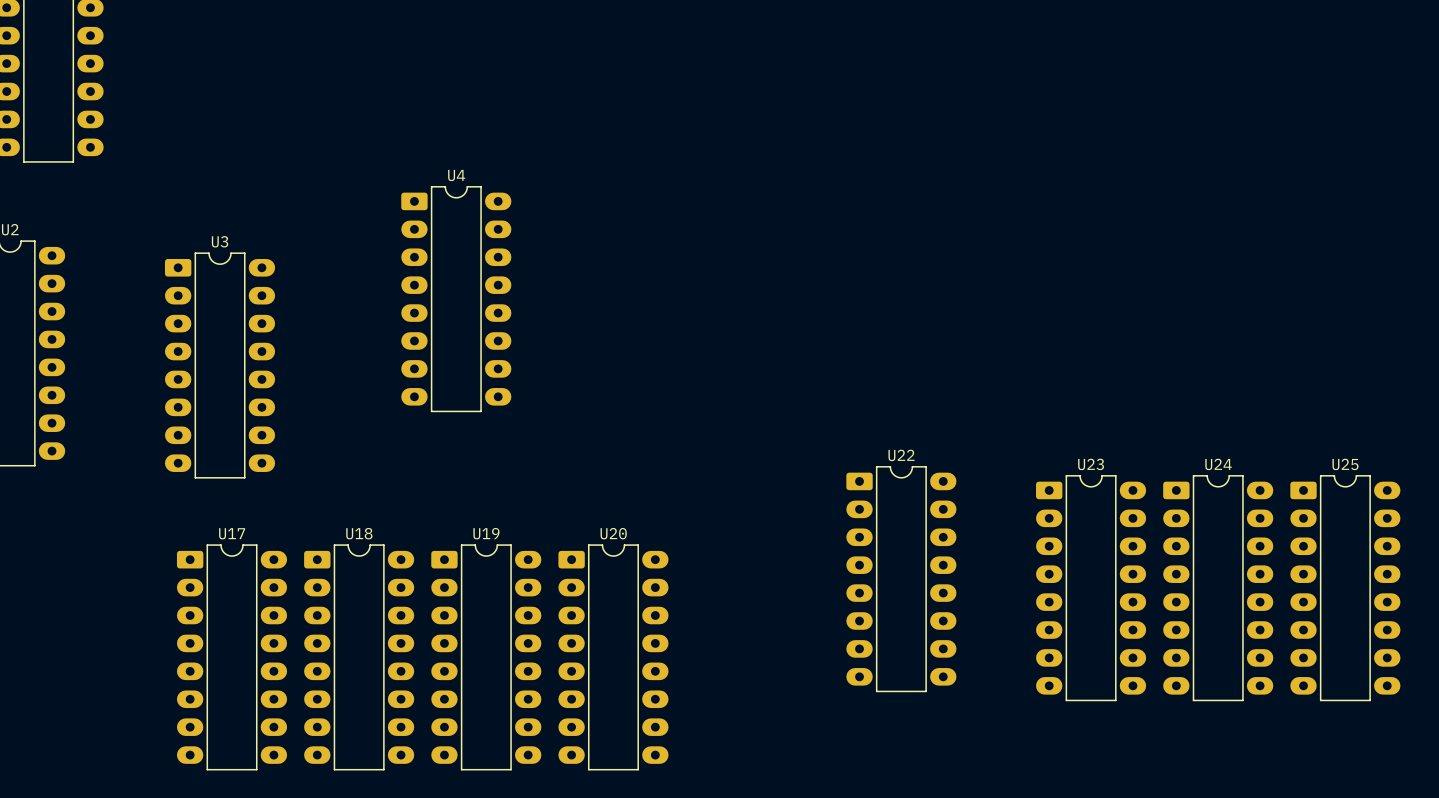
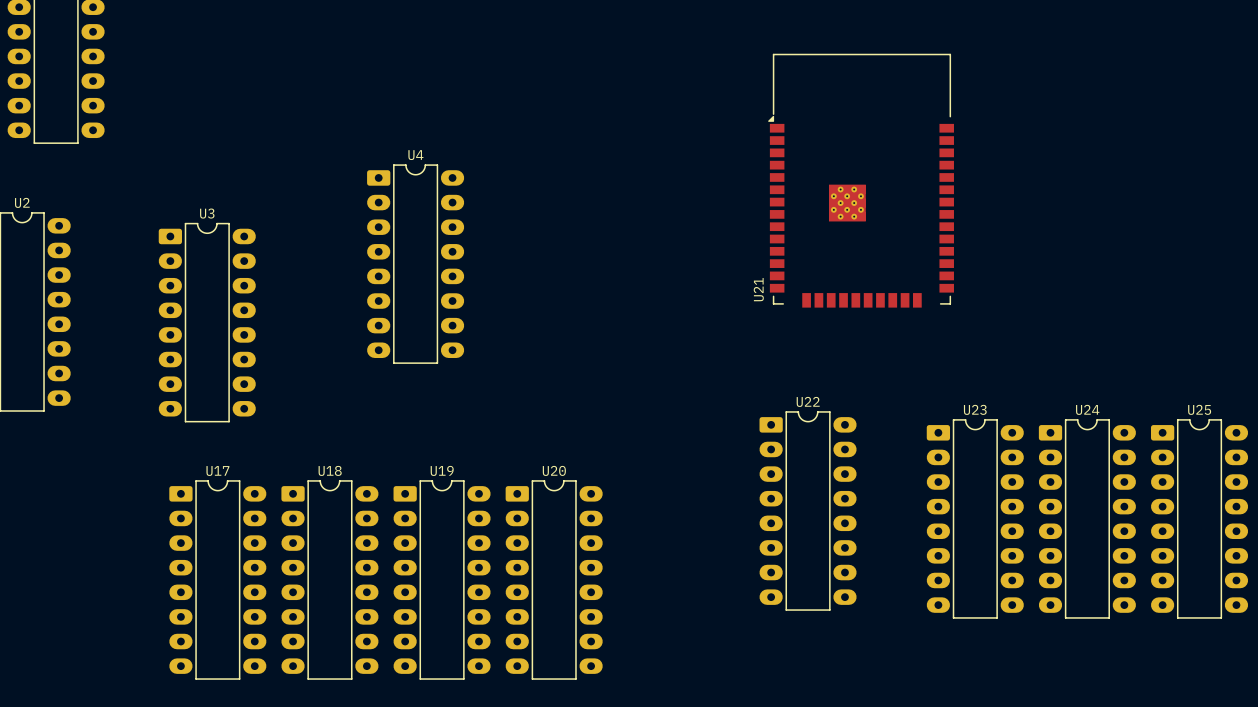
U21: none -> (861, 180)

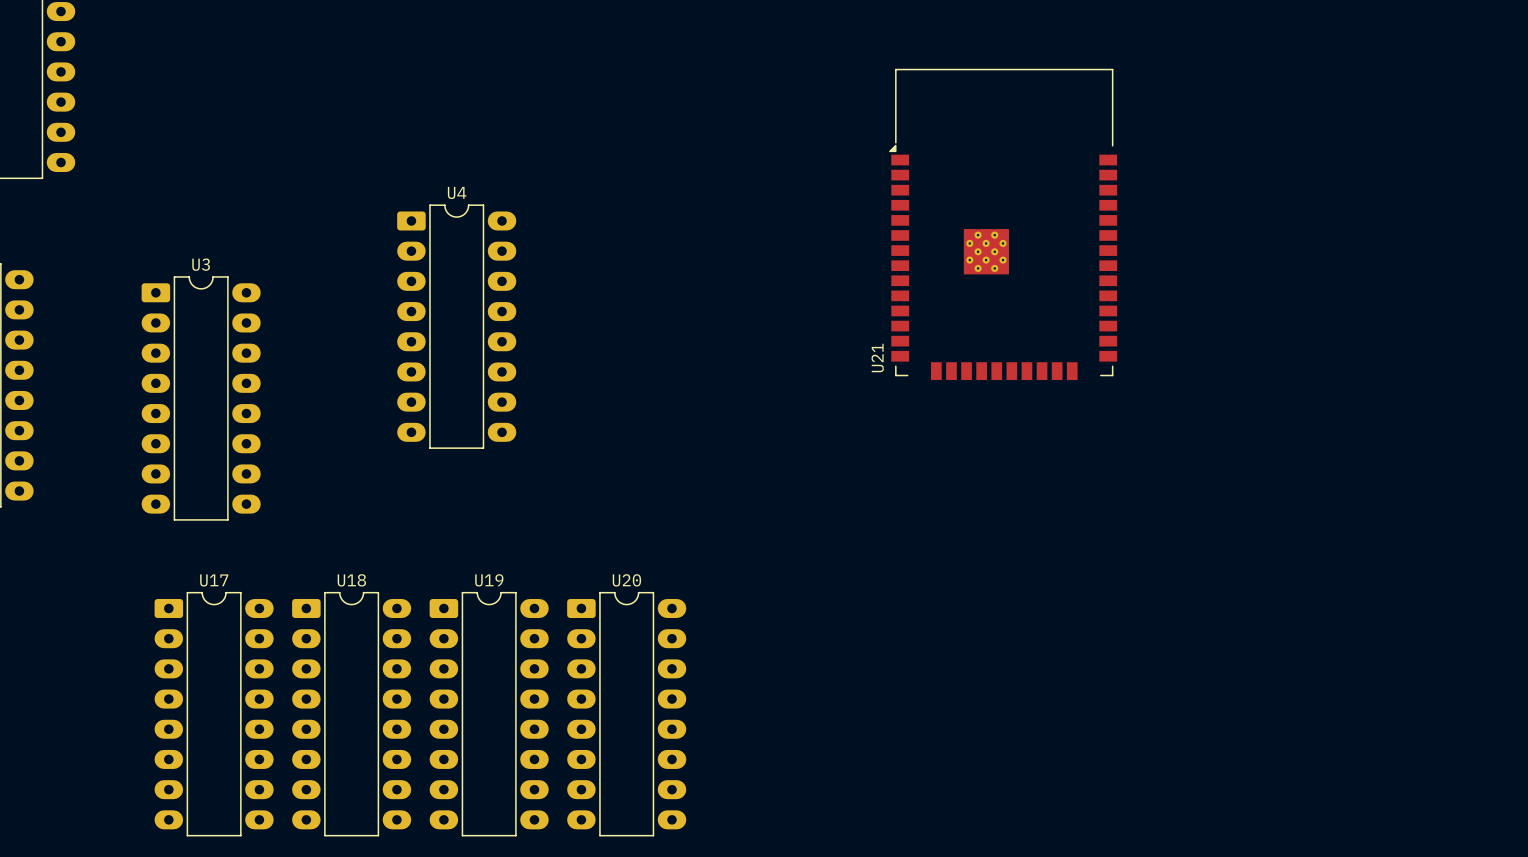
U22: (808, 511) -> none
U23: (975, 518) -> none
U24: (1087, 518) -> none
U25: (1199, 518) -> none

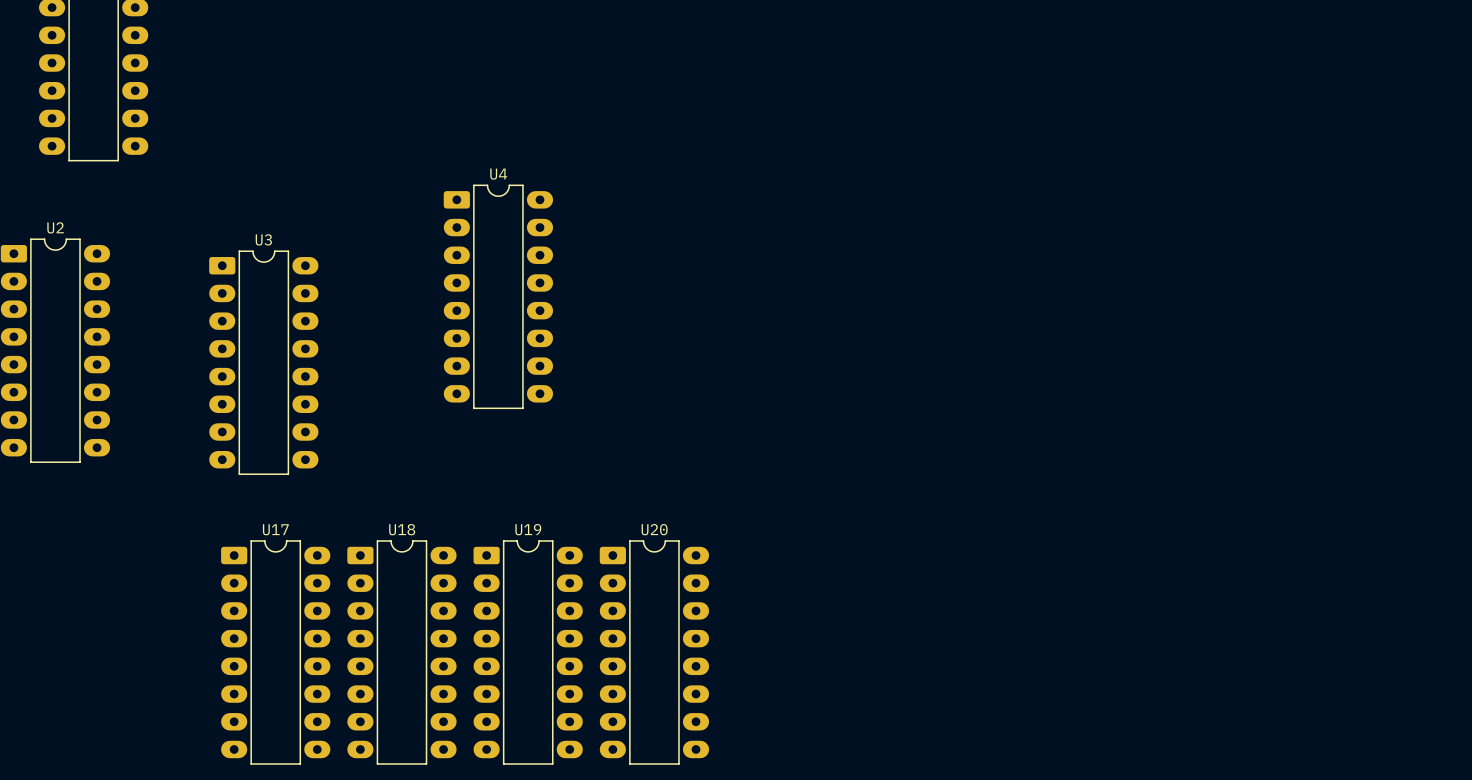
U21: (1003, 224) -> none

